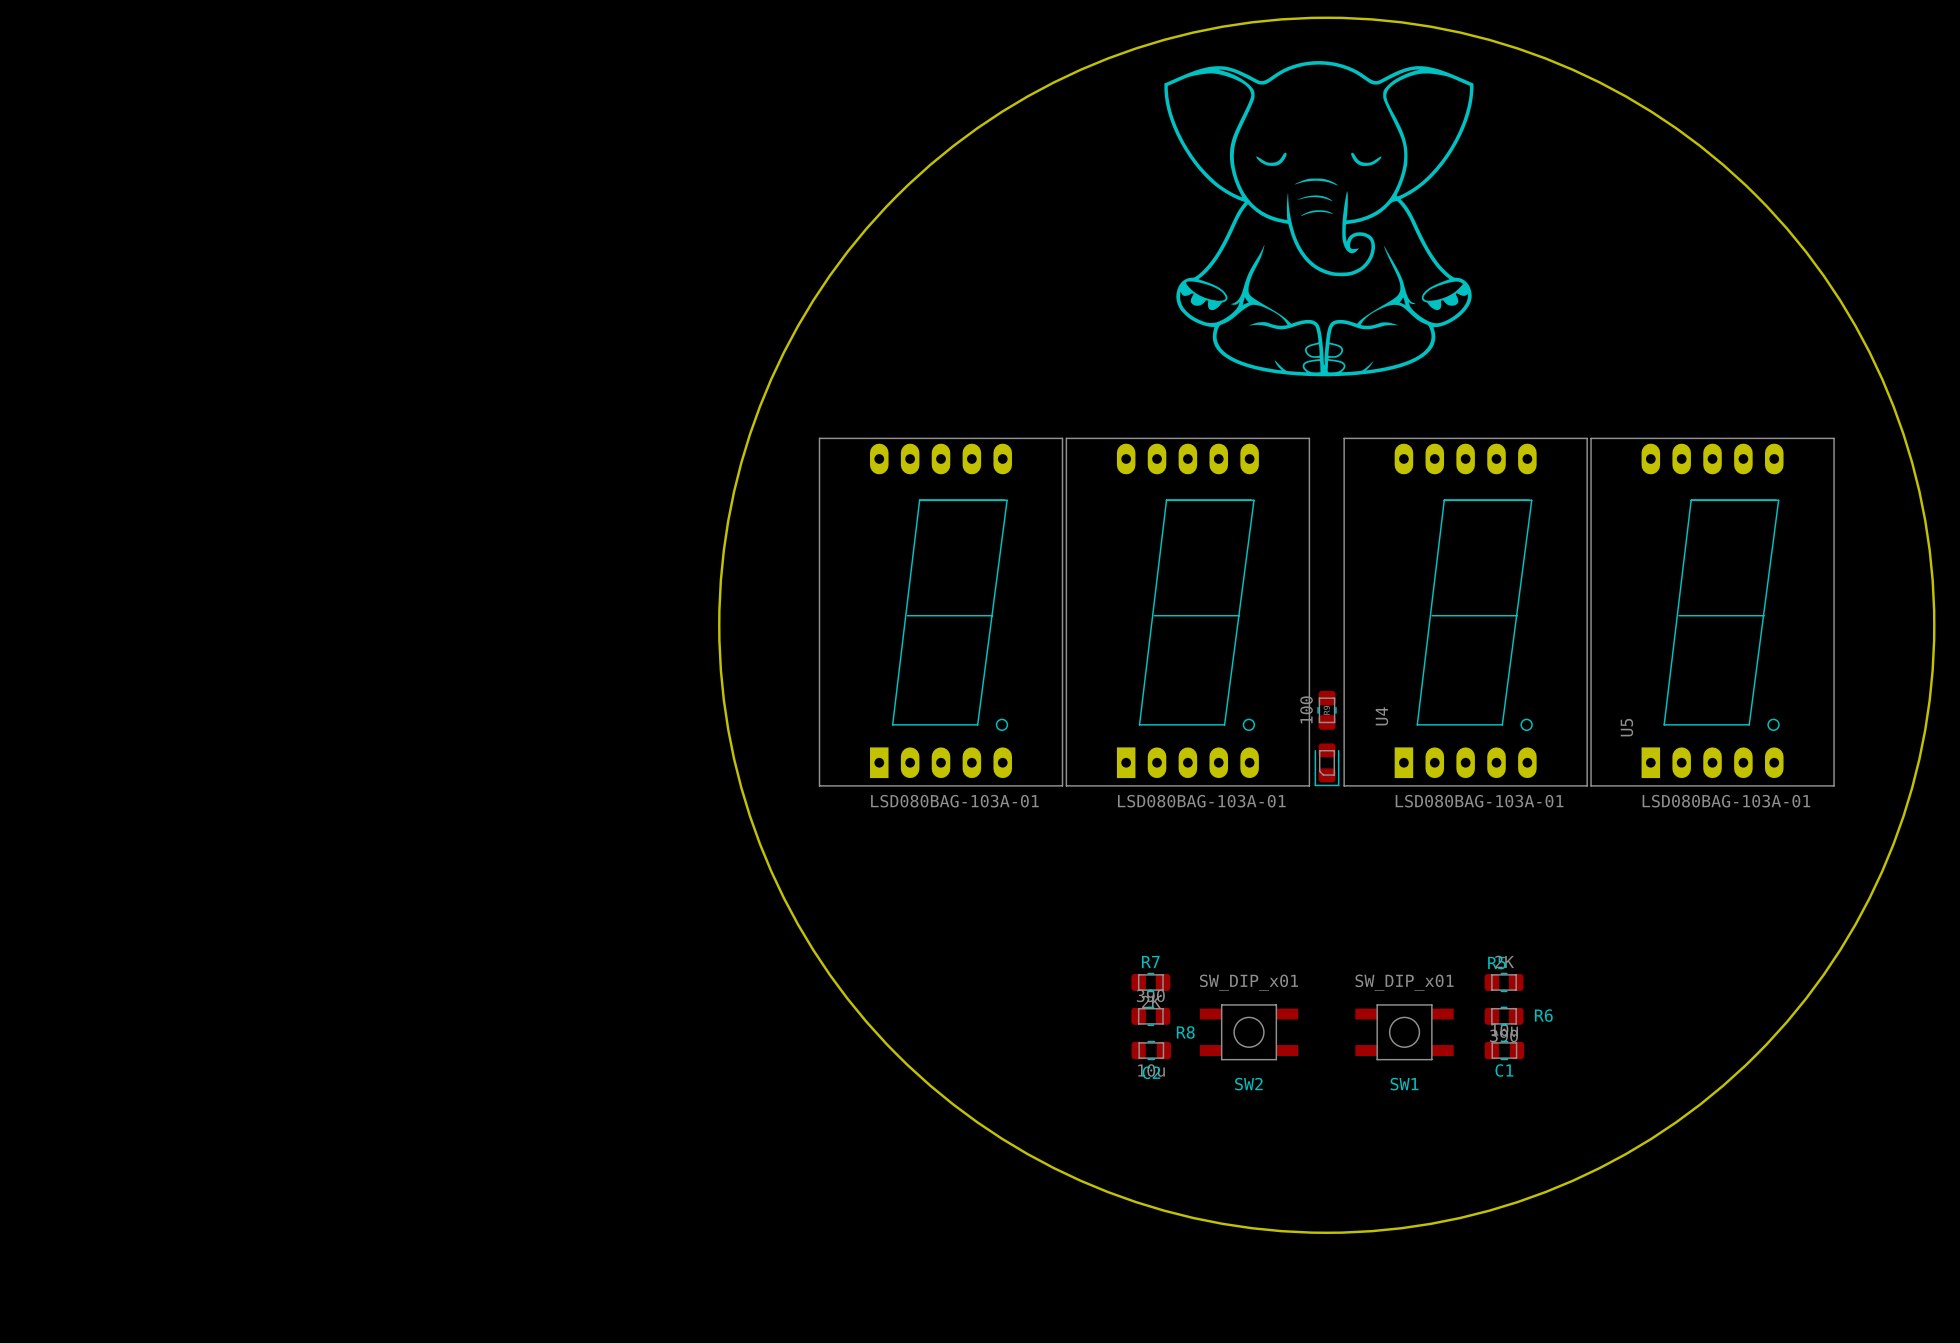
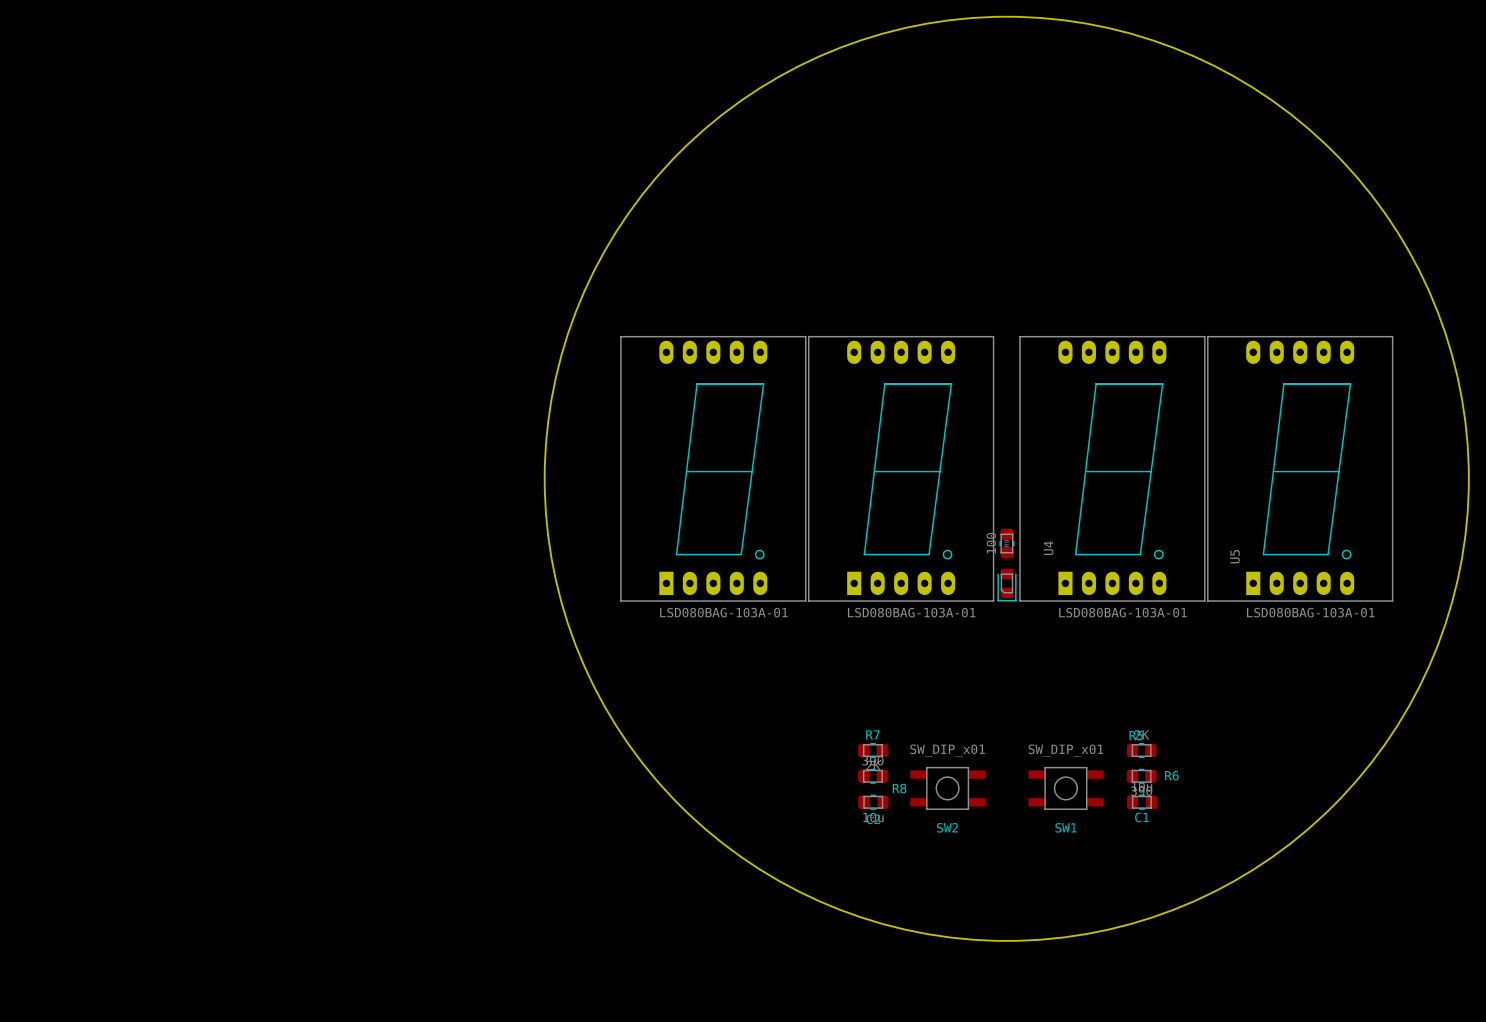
drawing: [1164, 61, 1474, 377] -> none

